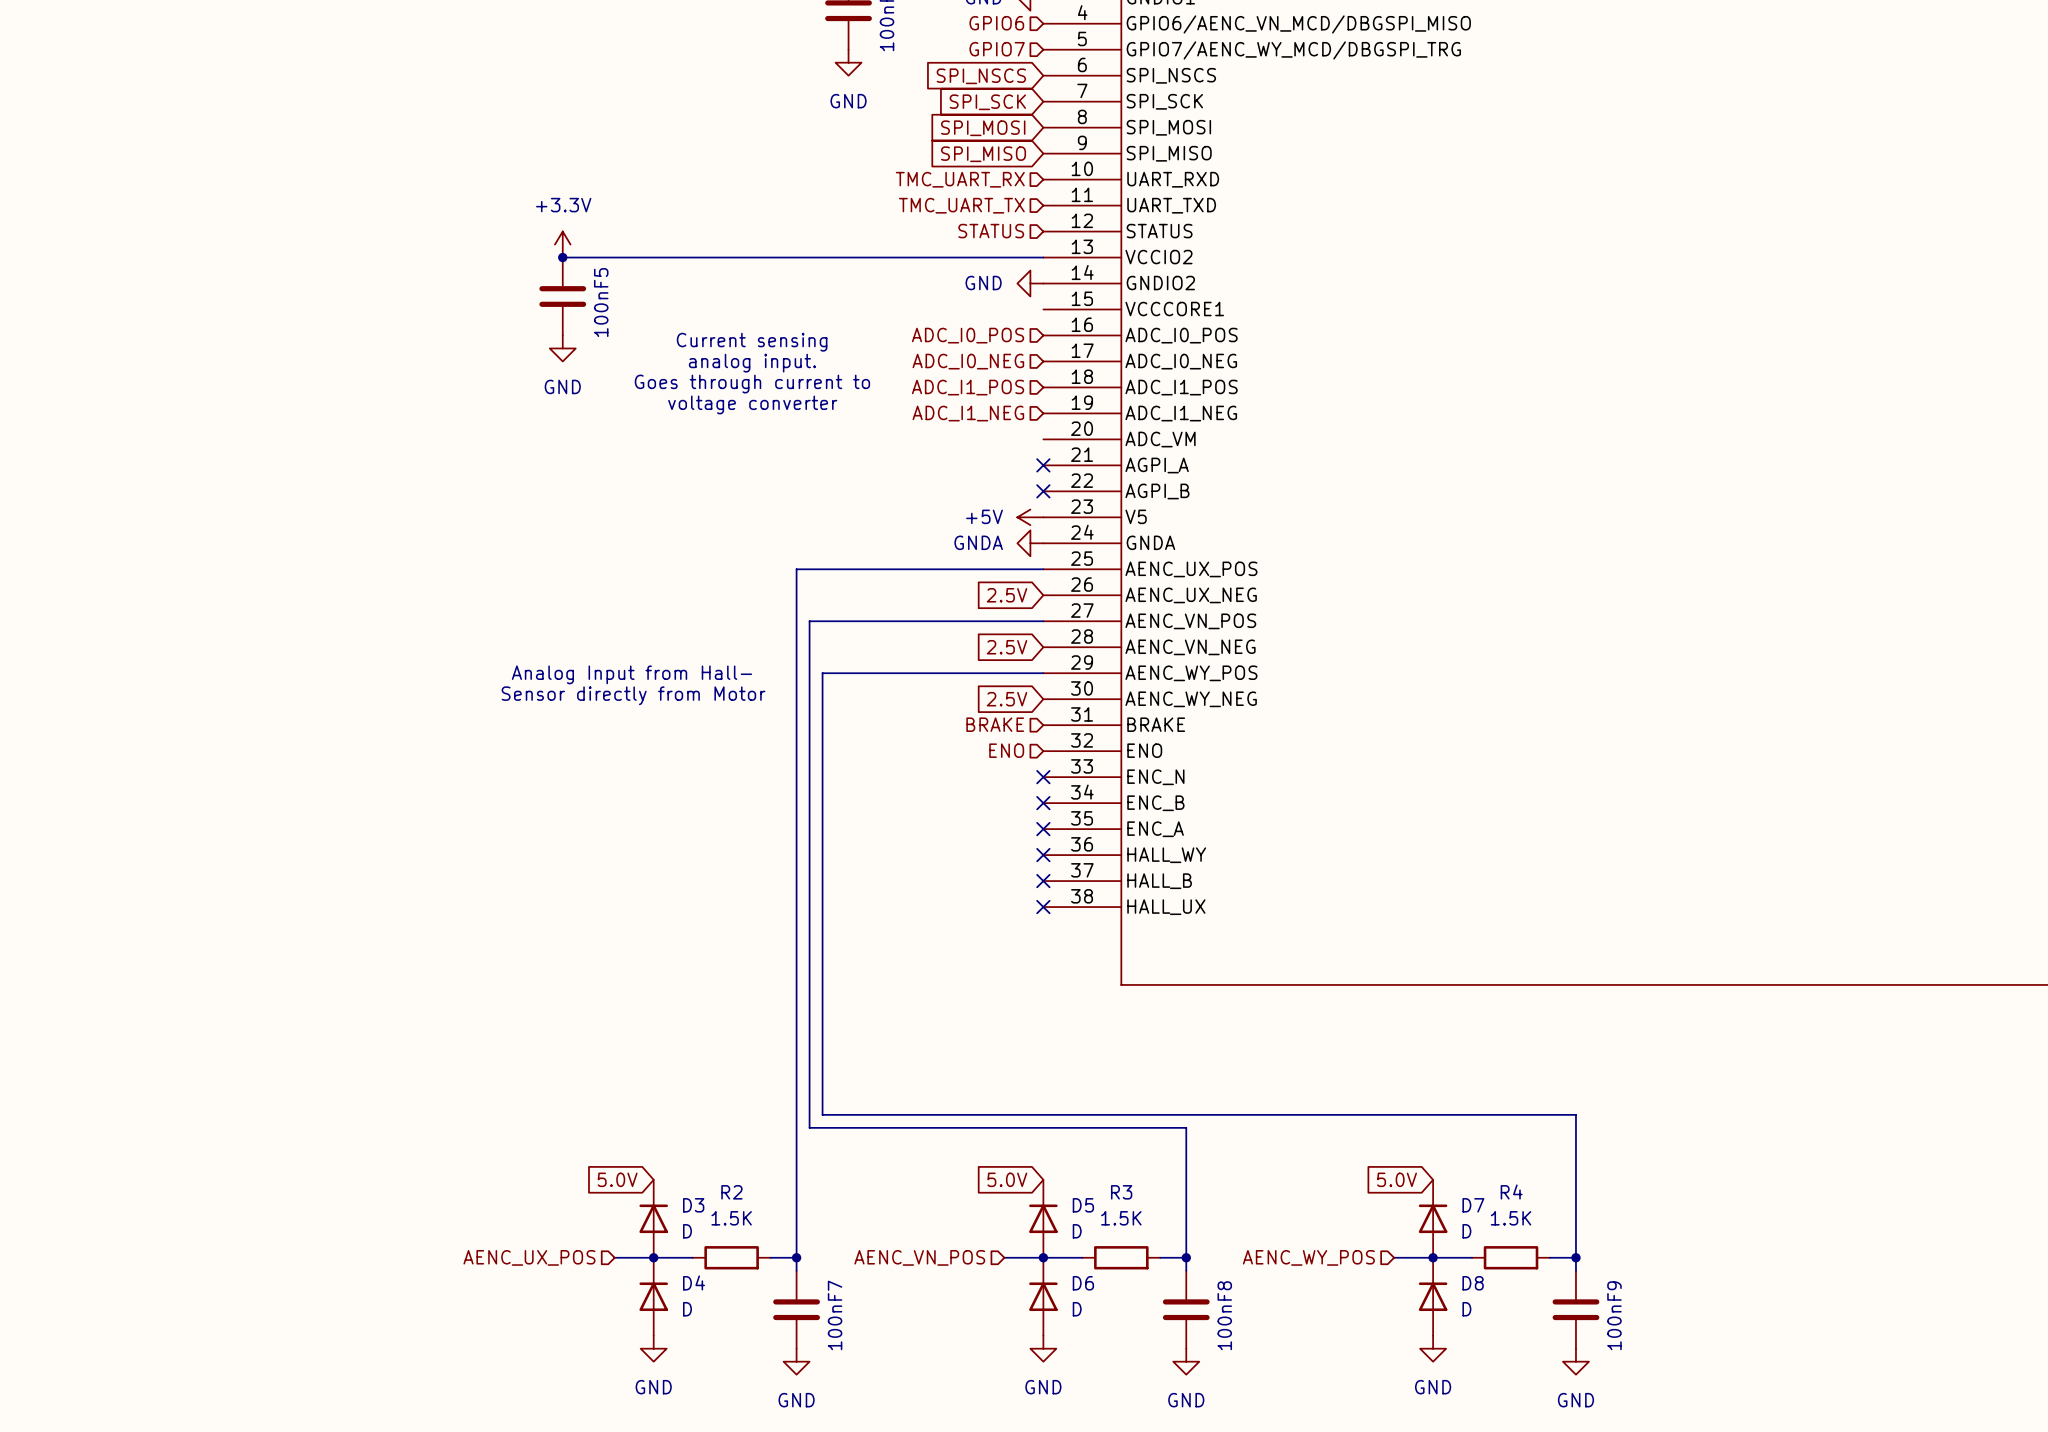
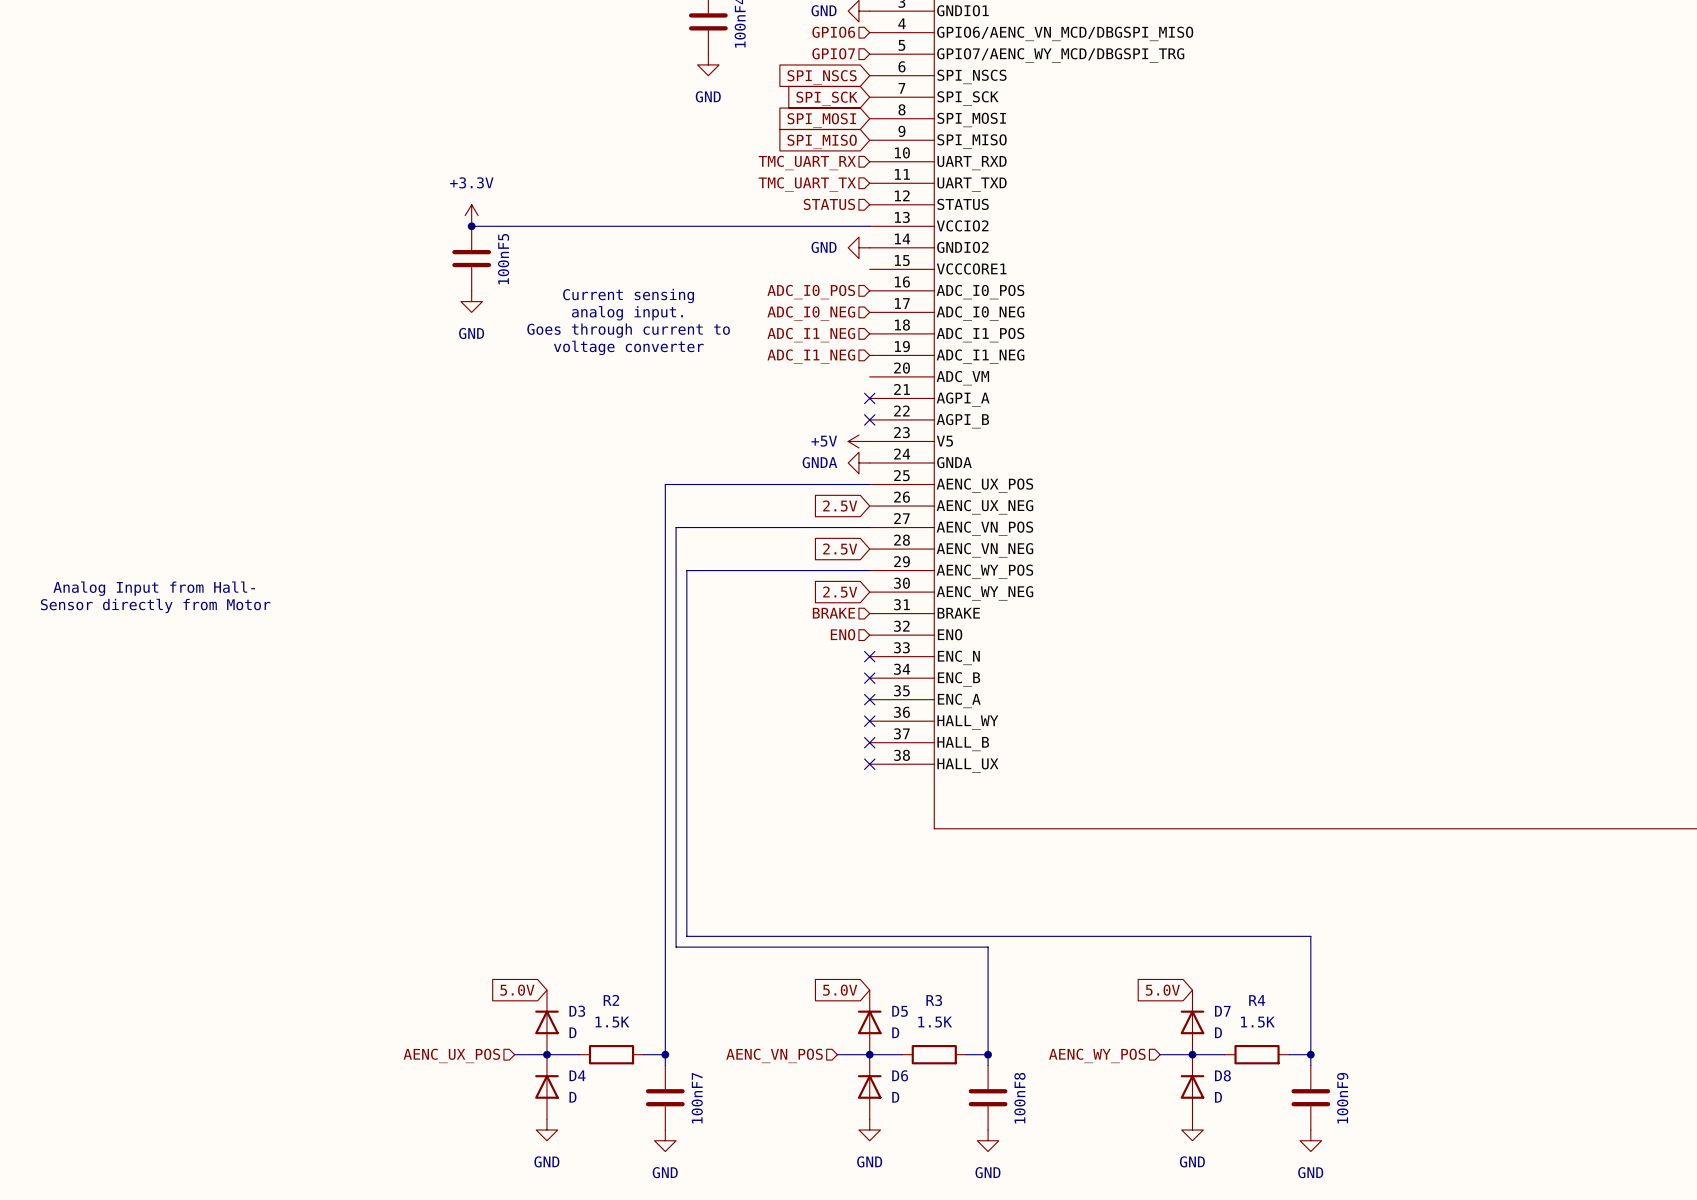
hierarchical label: ADC_I1_POS (968, 387) -> ADC_I1_NEG (811, 335)
text: Analog Input from Hall- (631, 674) -> none
text: none -> Analog Input from Hall- (154, 588)
text: Sensor directly from Motor (633, 695) -> none
text: none -> Sensor directly from Motor (155, 605)

